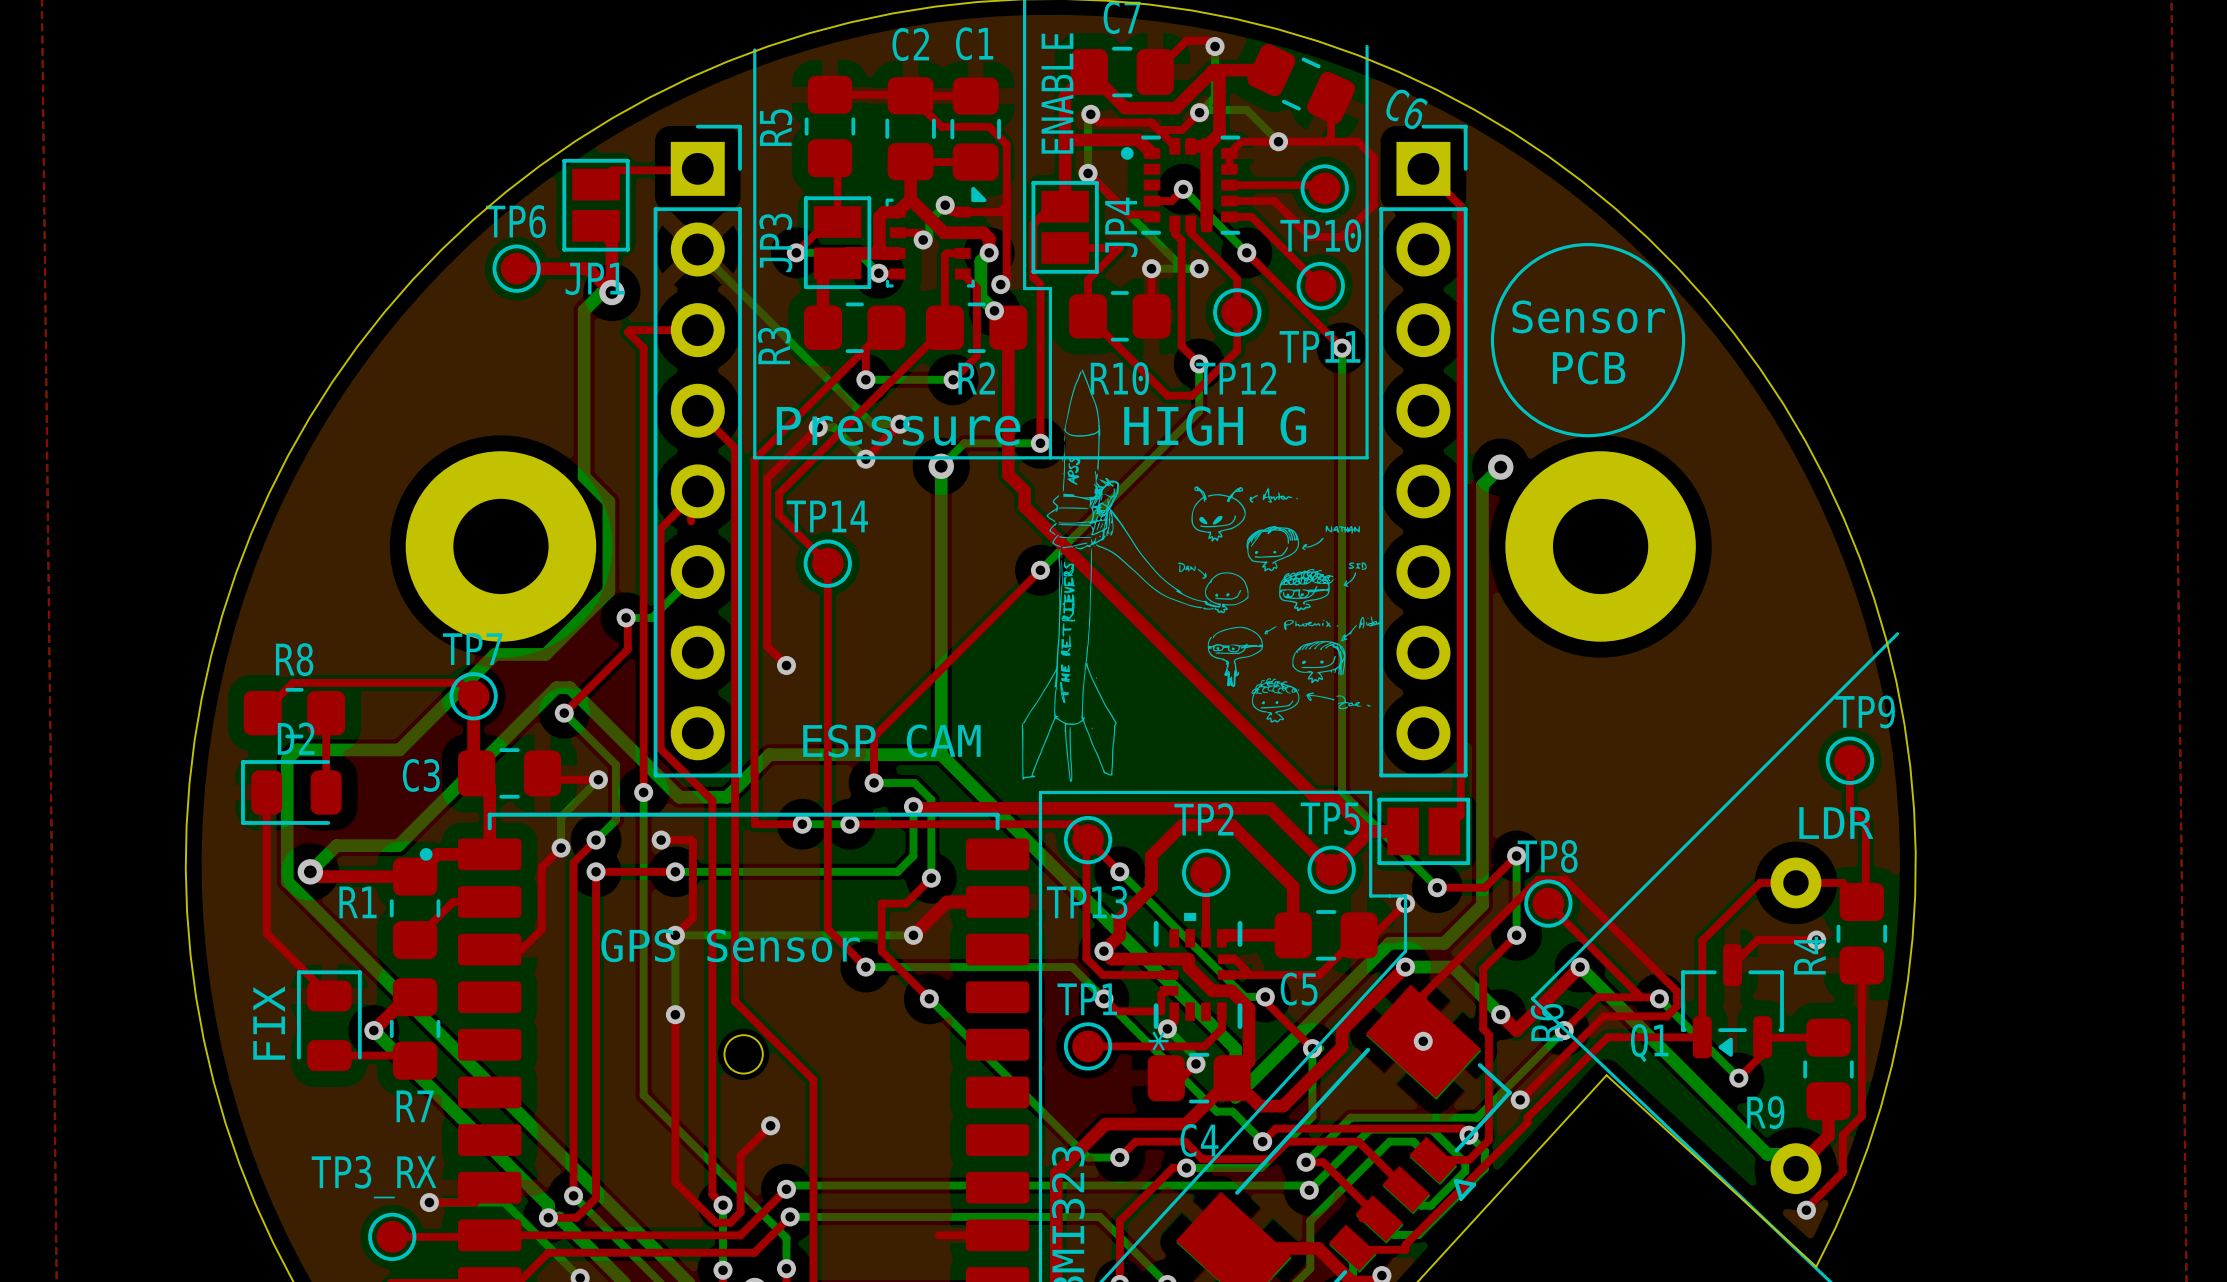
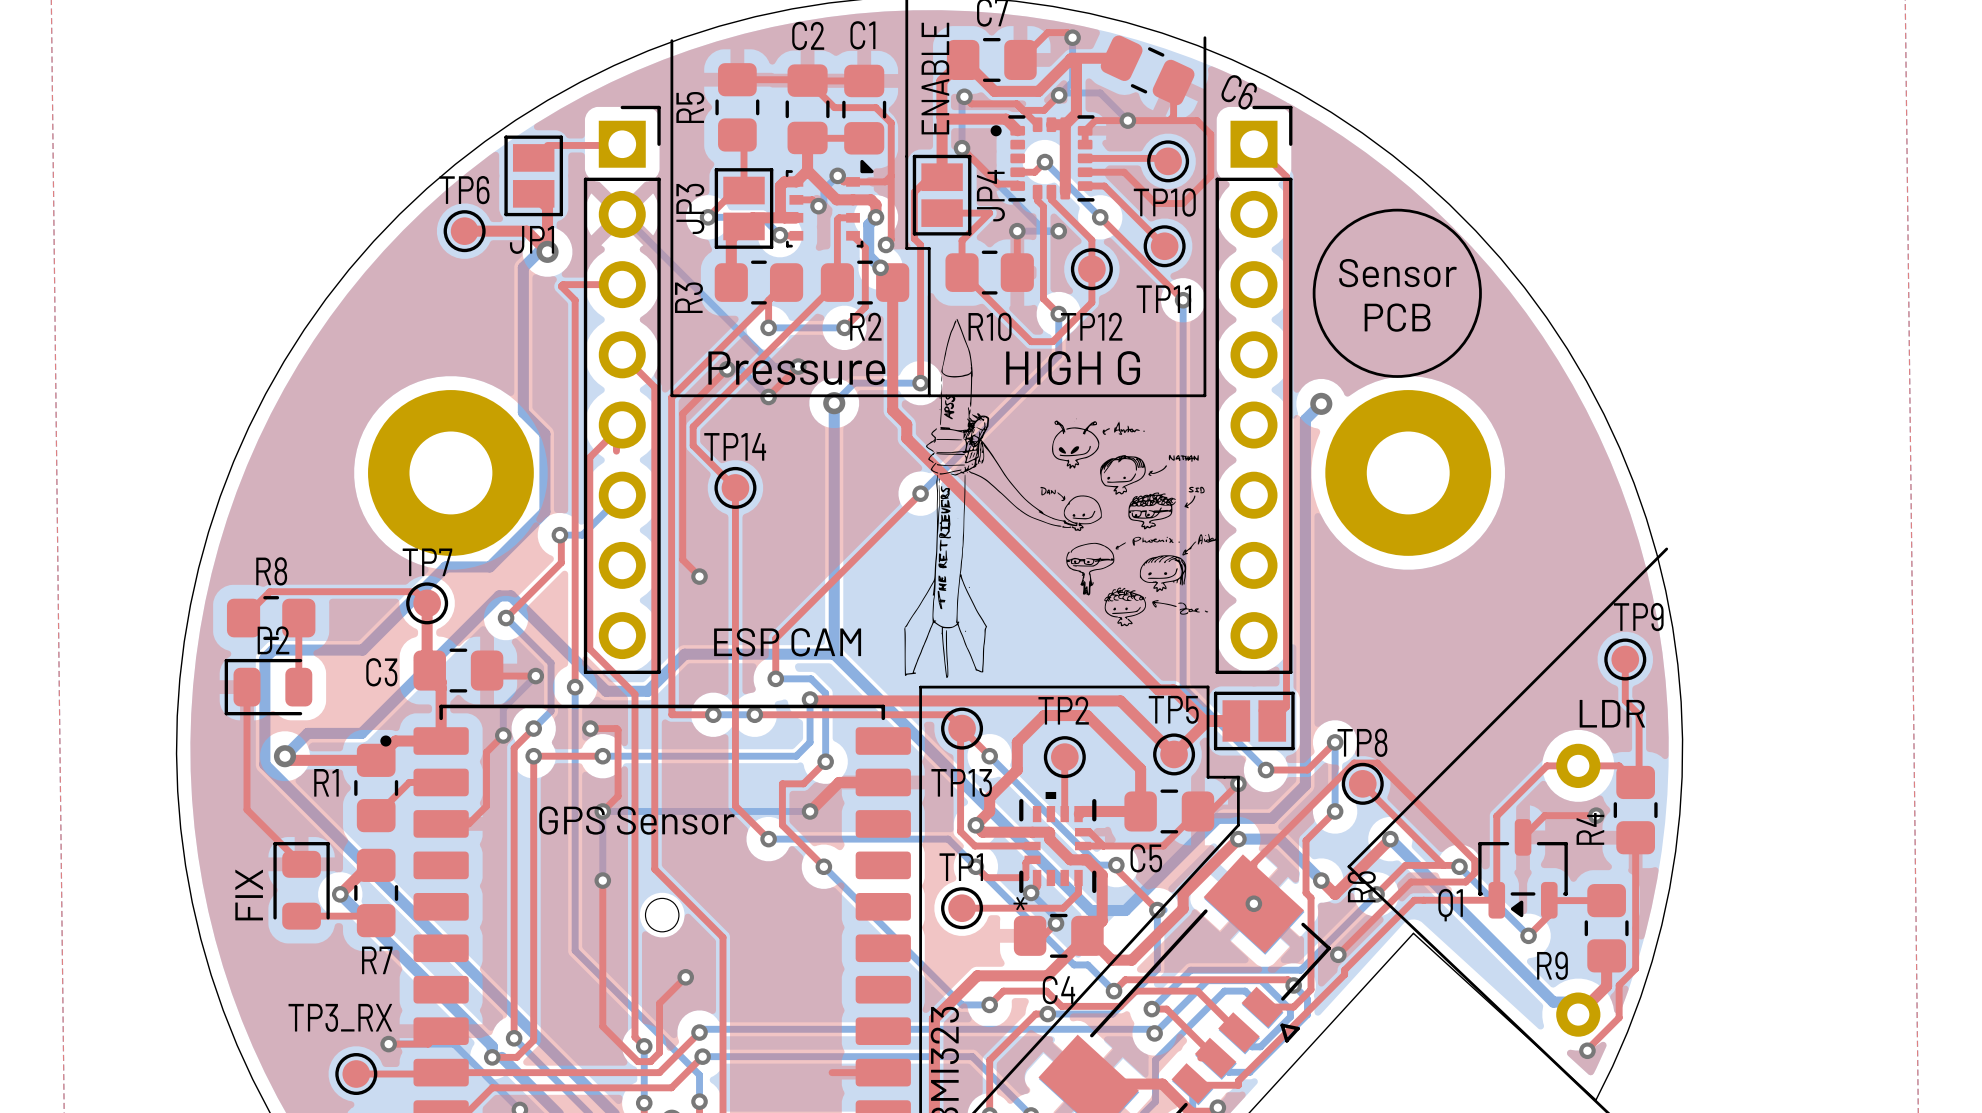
bottom track: (1389, 943) (1235, 1097) (1235, 1049) -> (1224, 818) (1217, 818) (1125, 910) (1090, 910)

